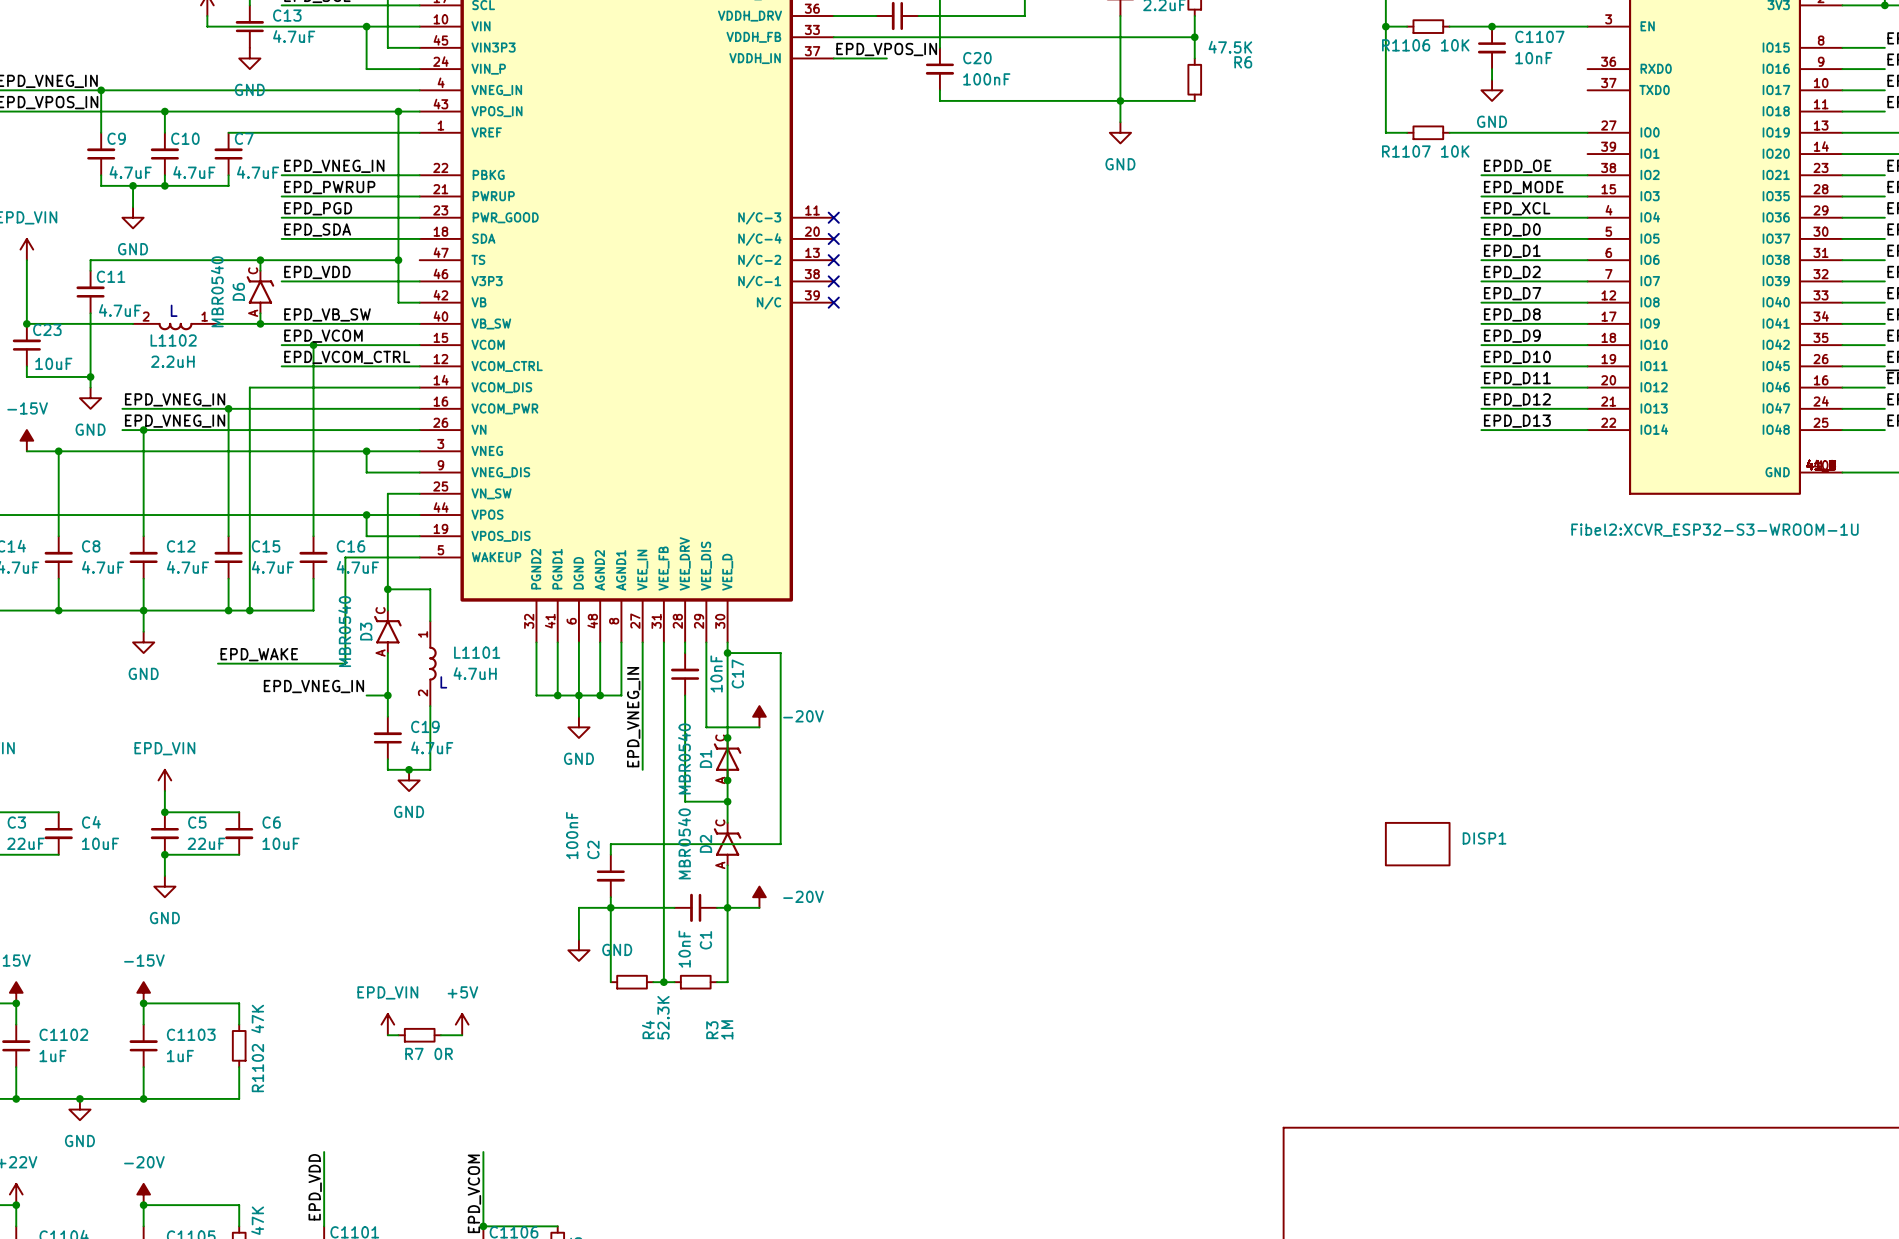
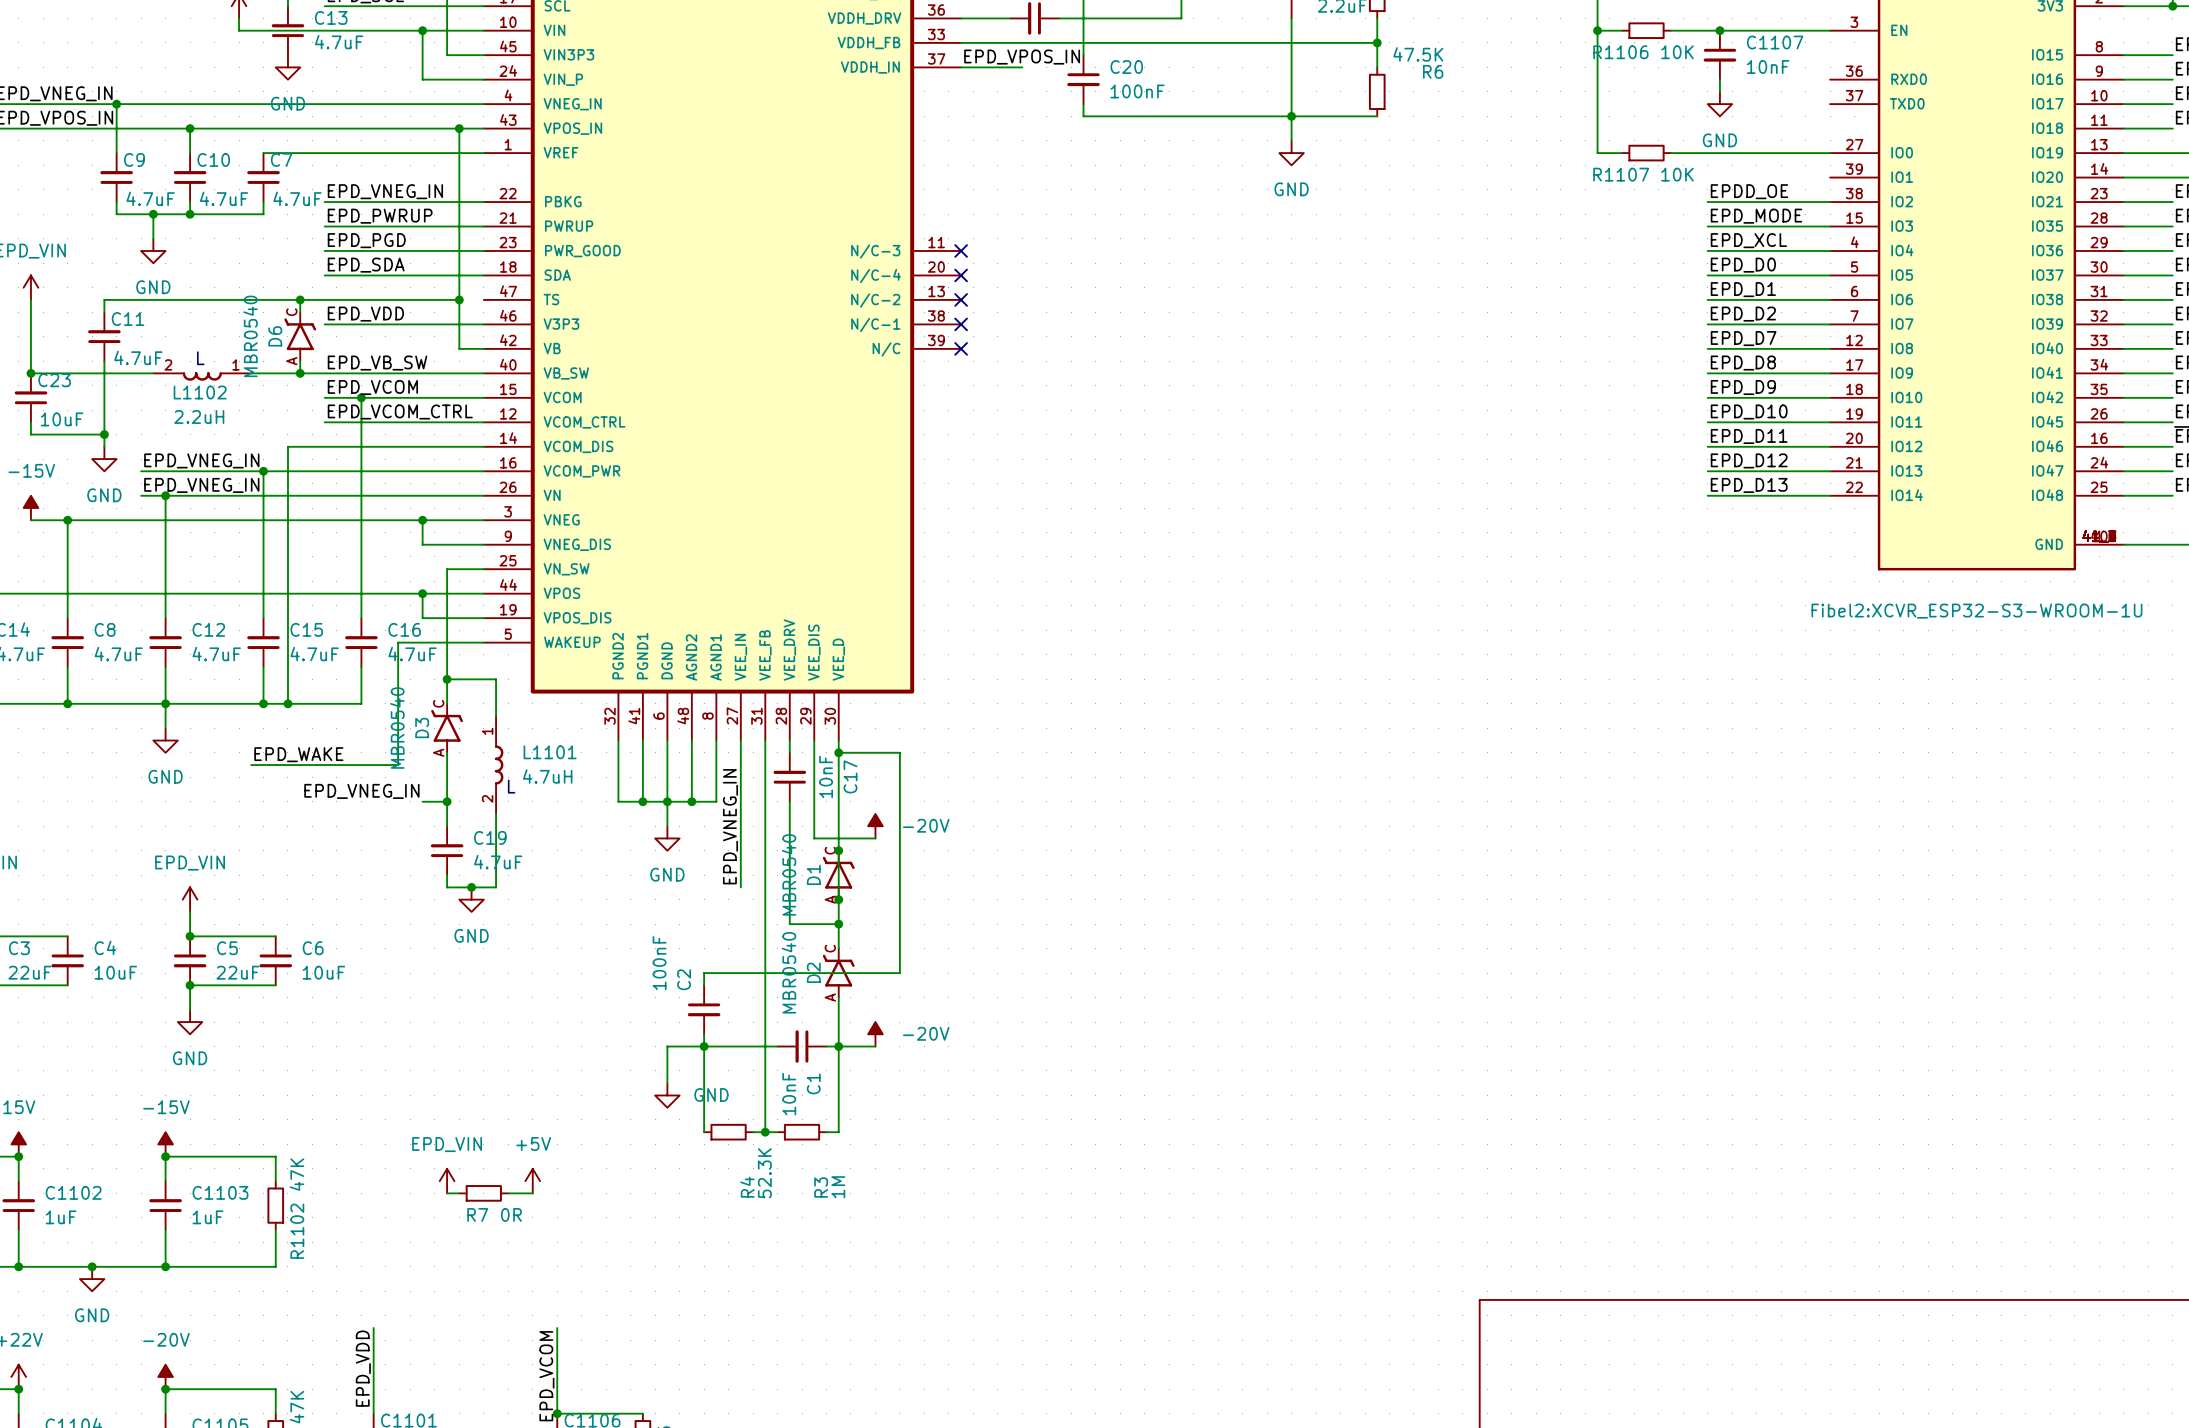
DISP1: (1417, 844) -> none

